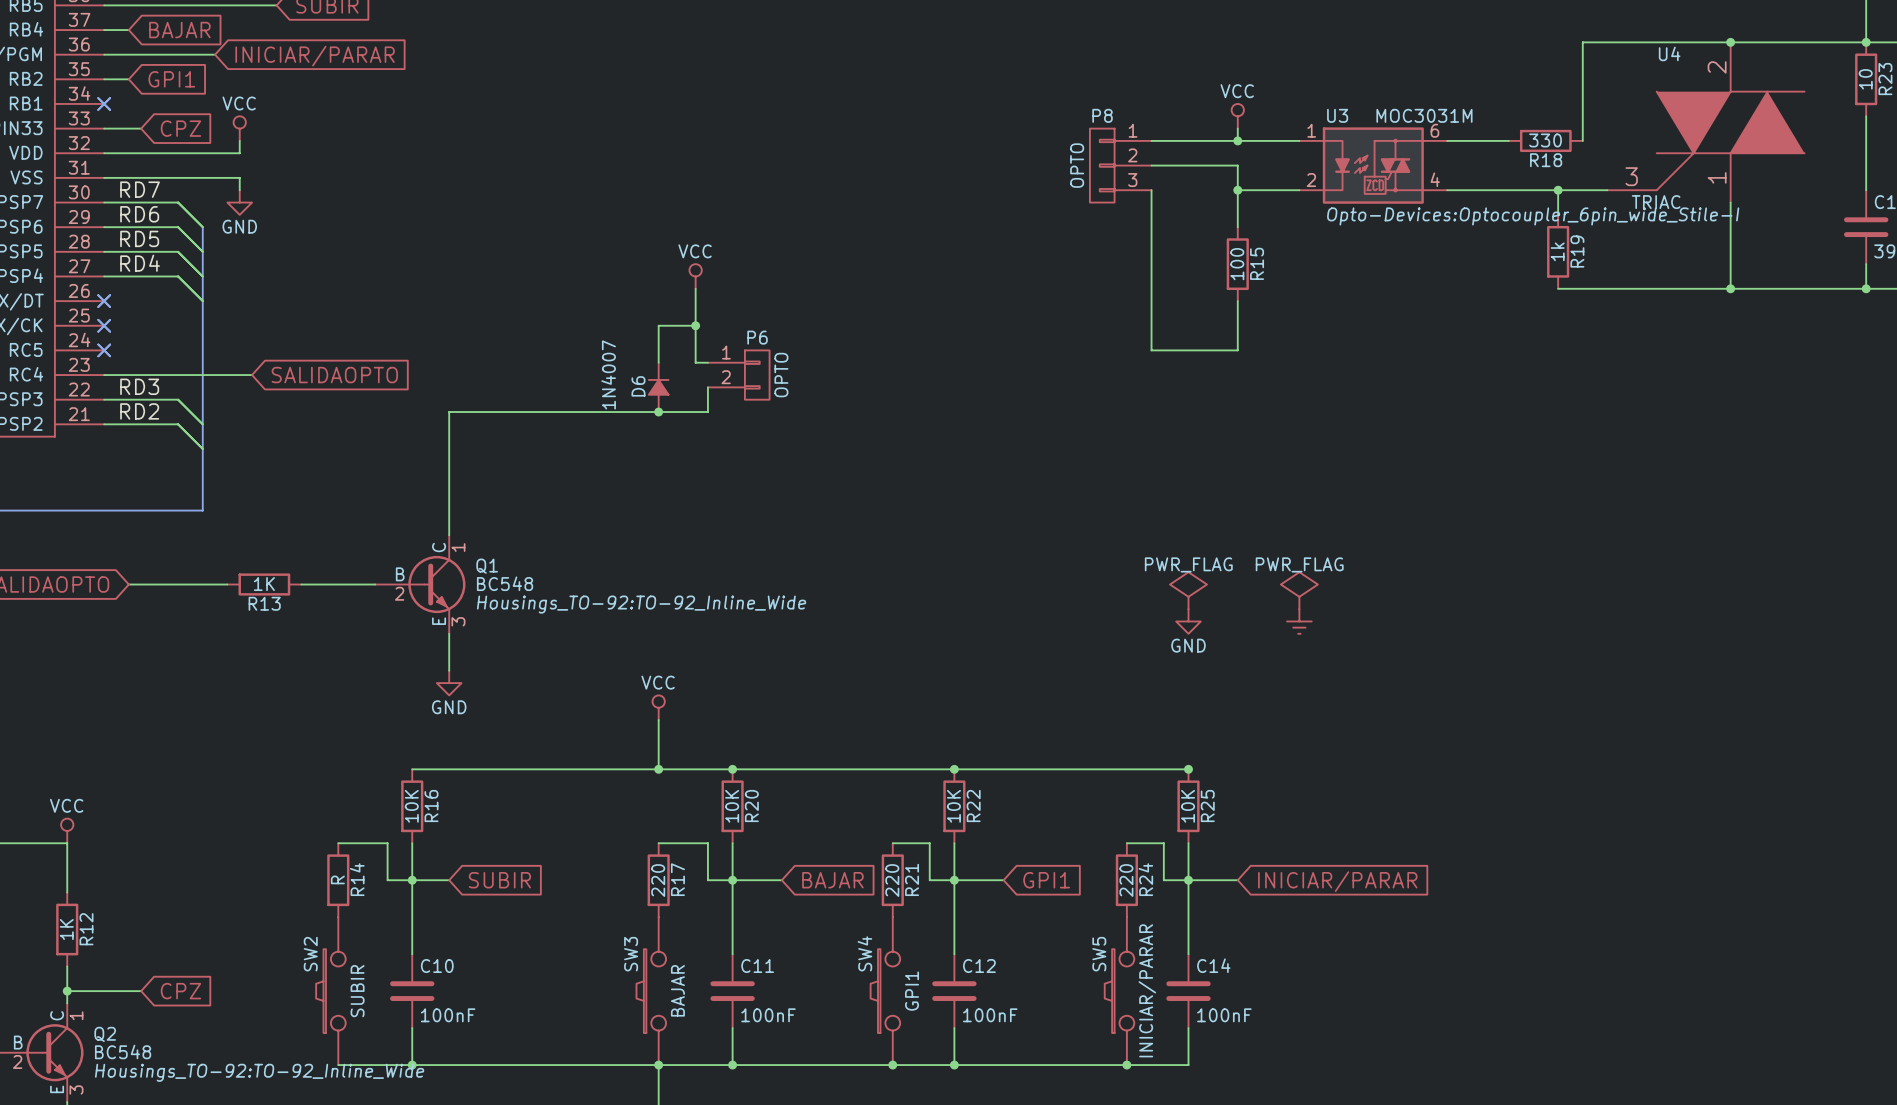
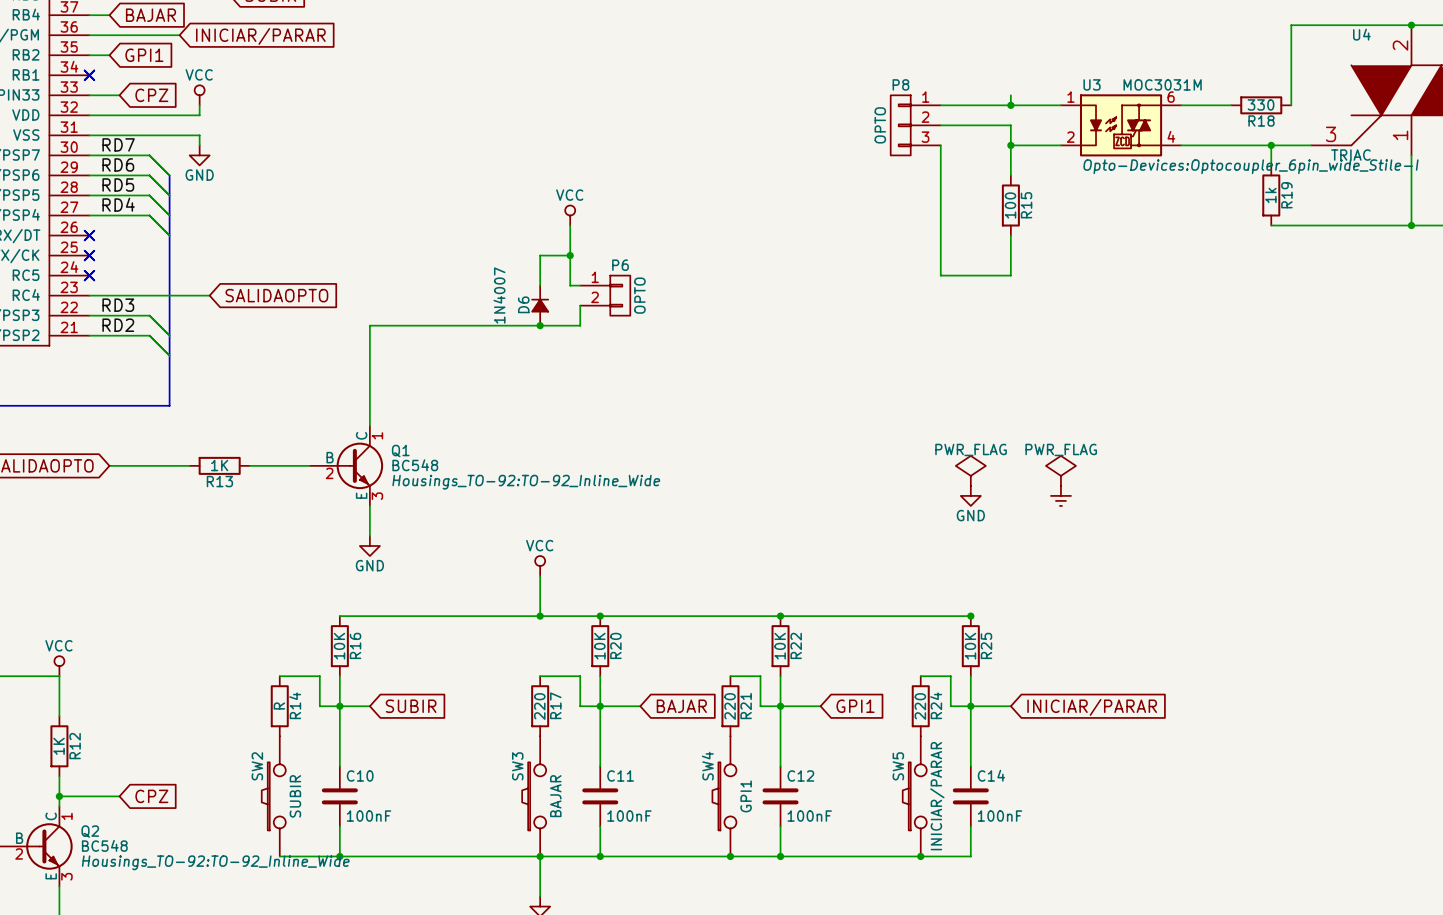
power symbol: VCC (1237, 116) -> none

